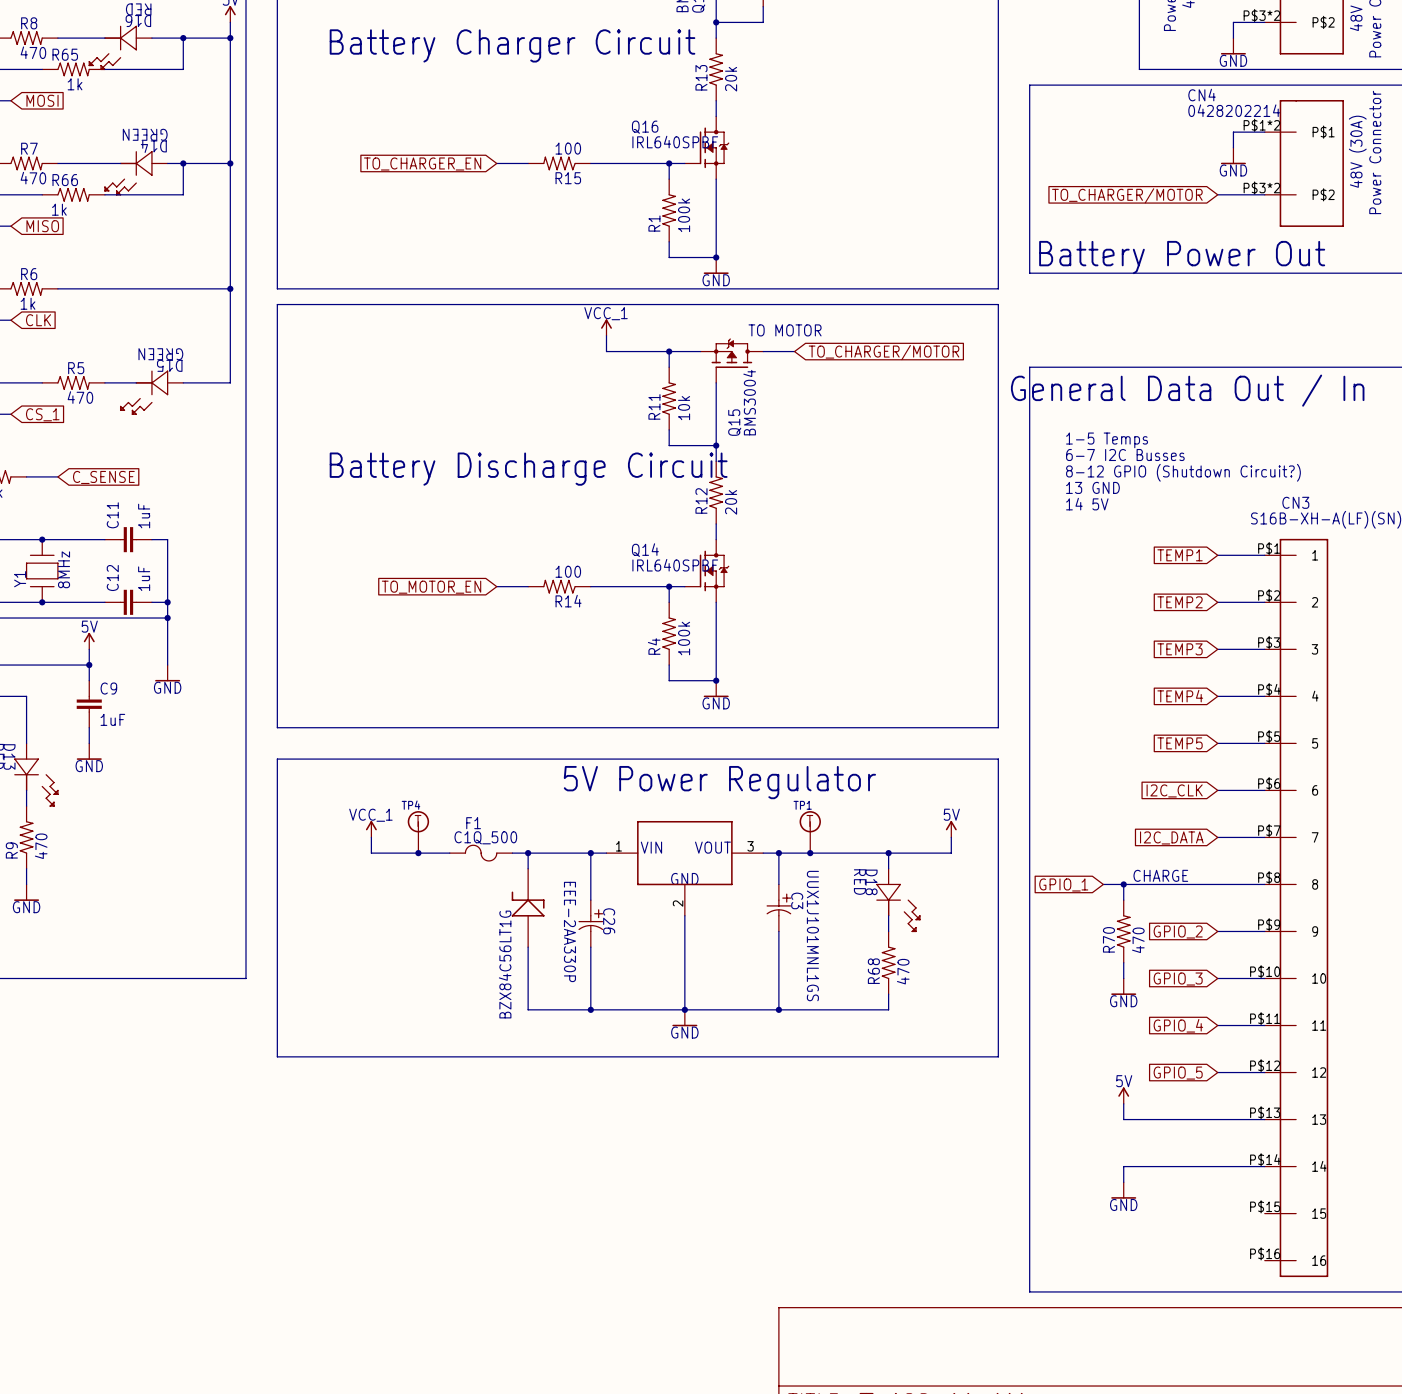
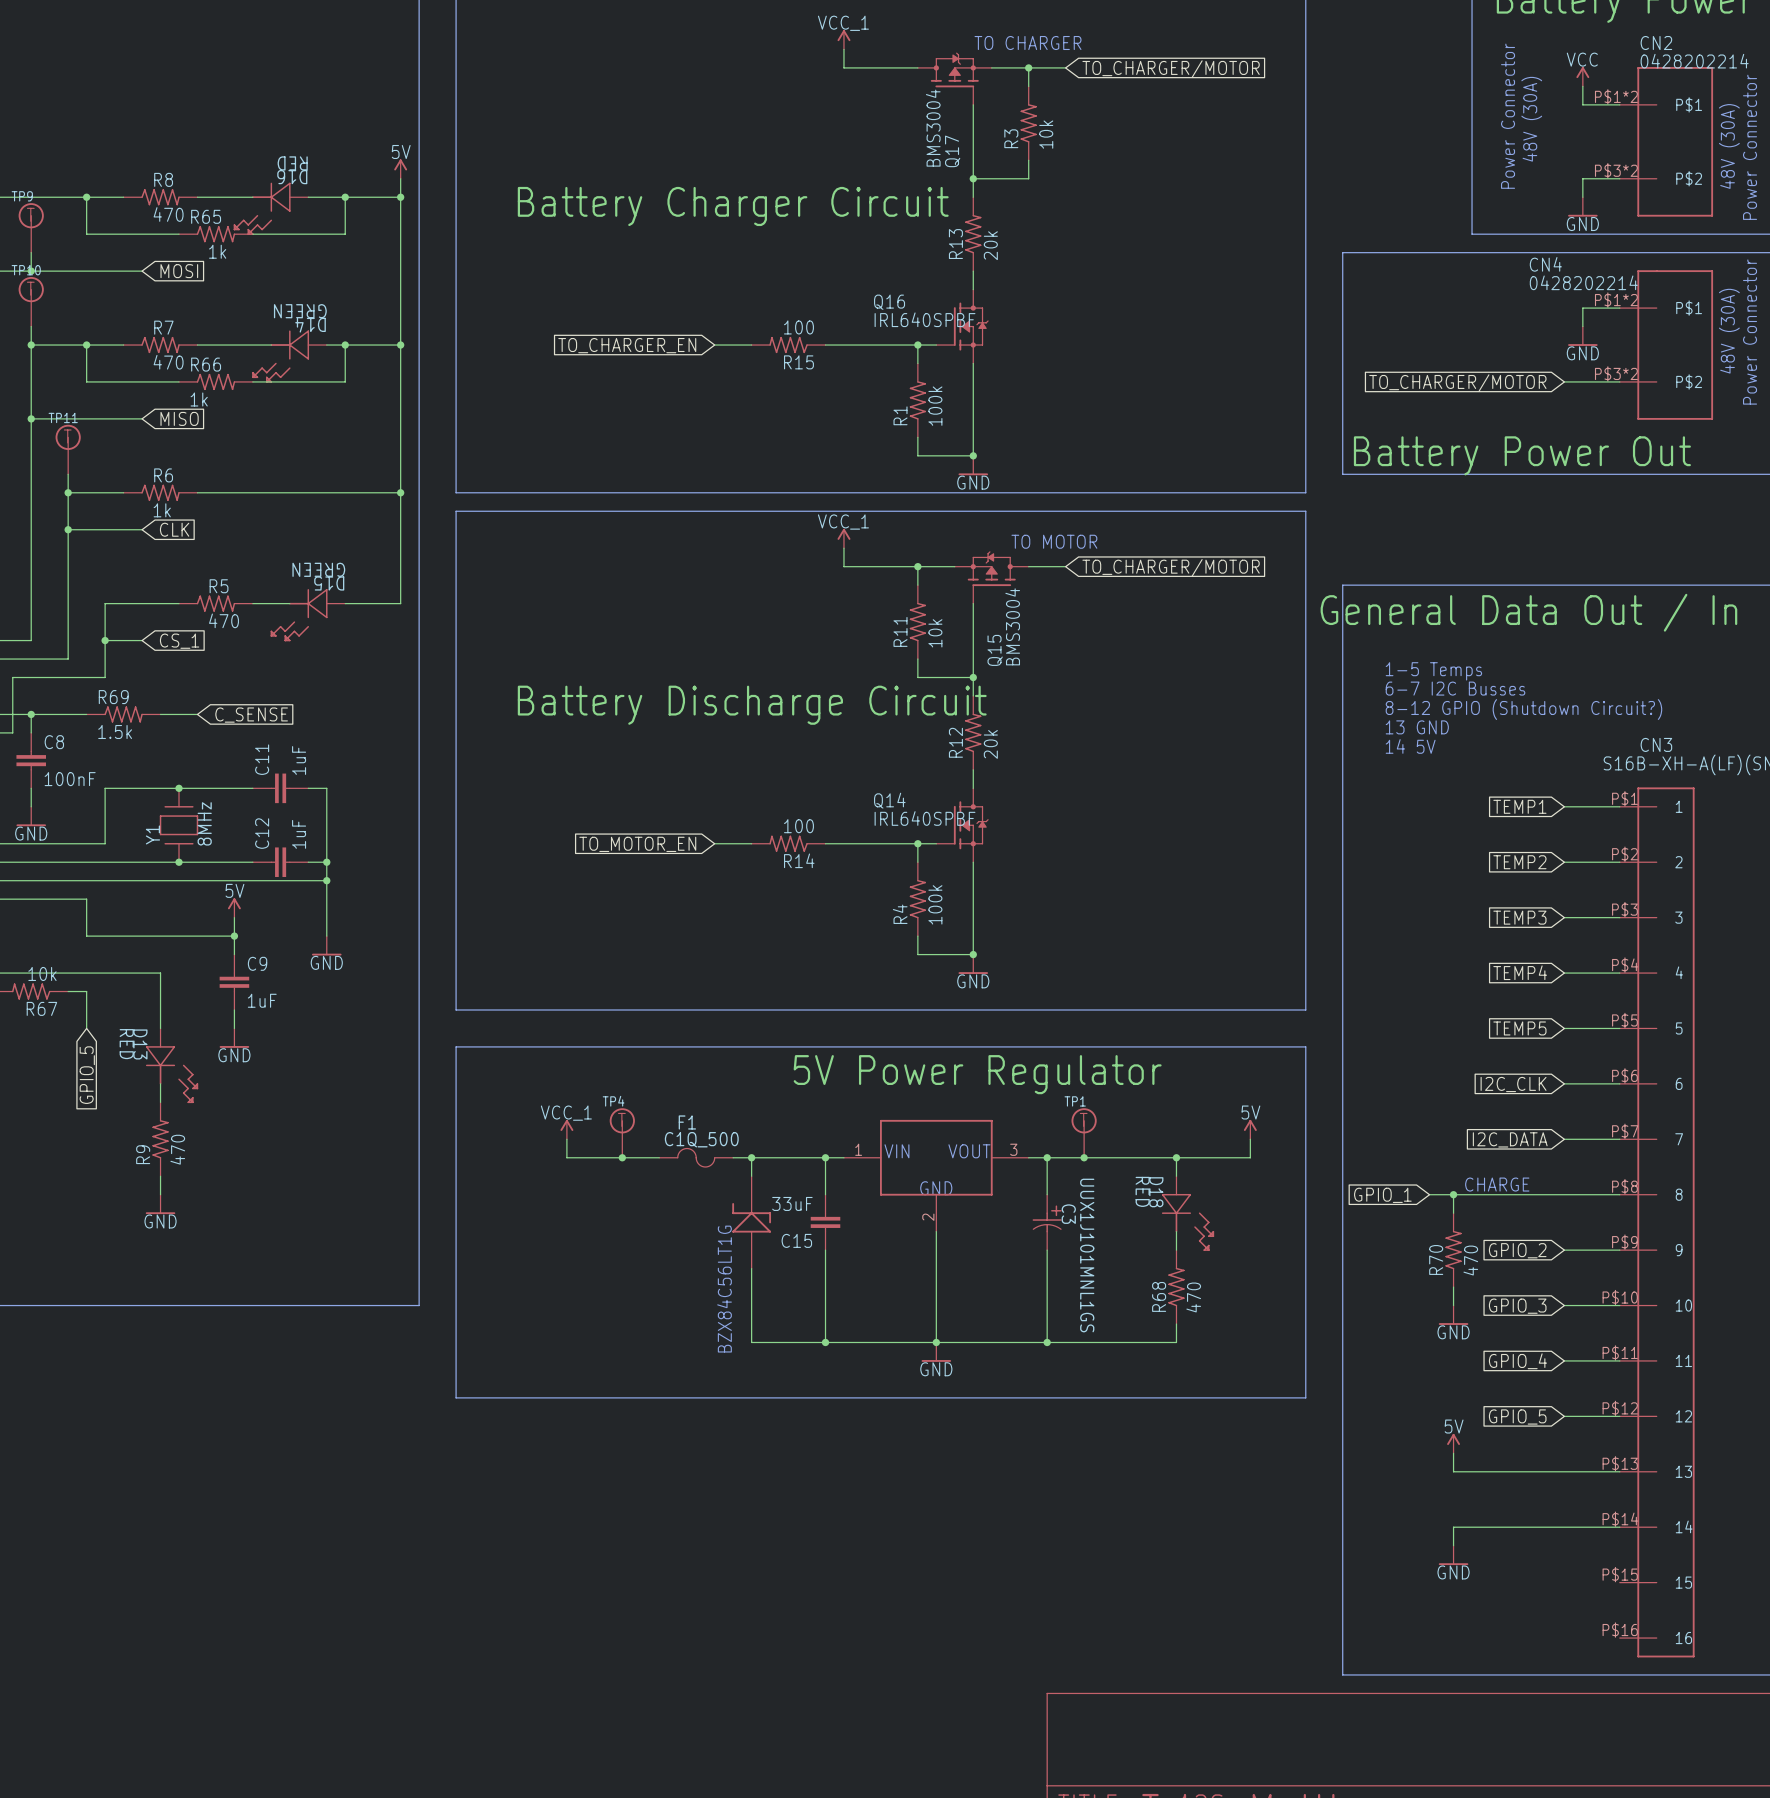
C15: none -> 33uF (825, 1222)
C26: EEE-2AA330P (590, 923) -> none

